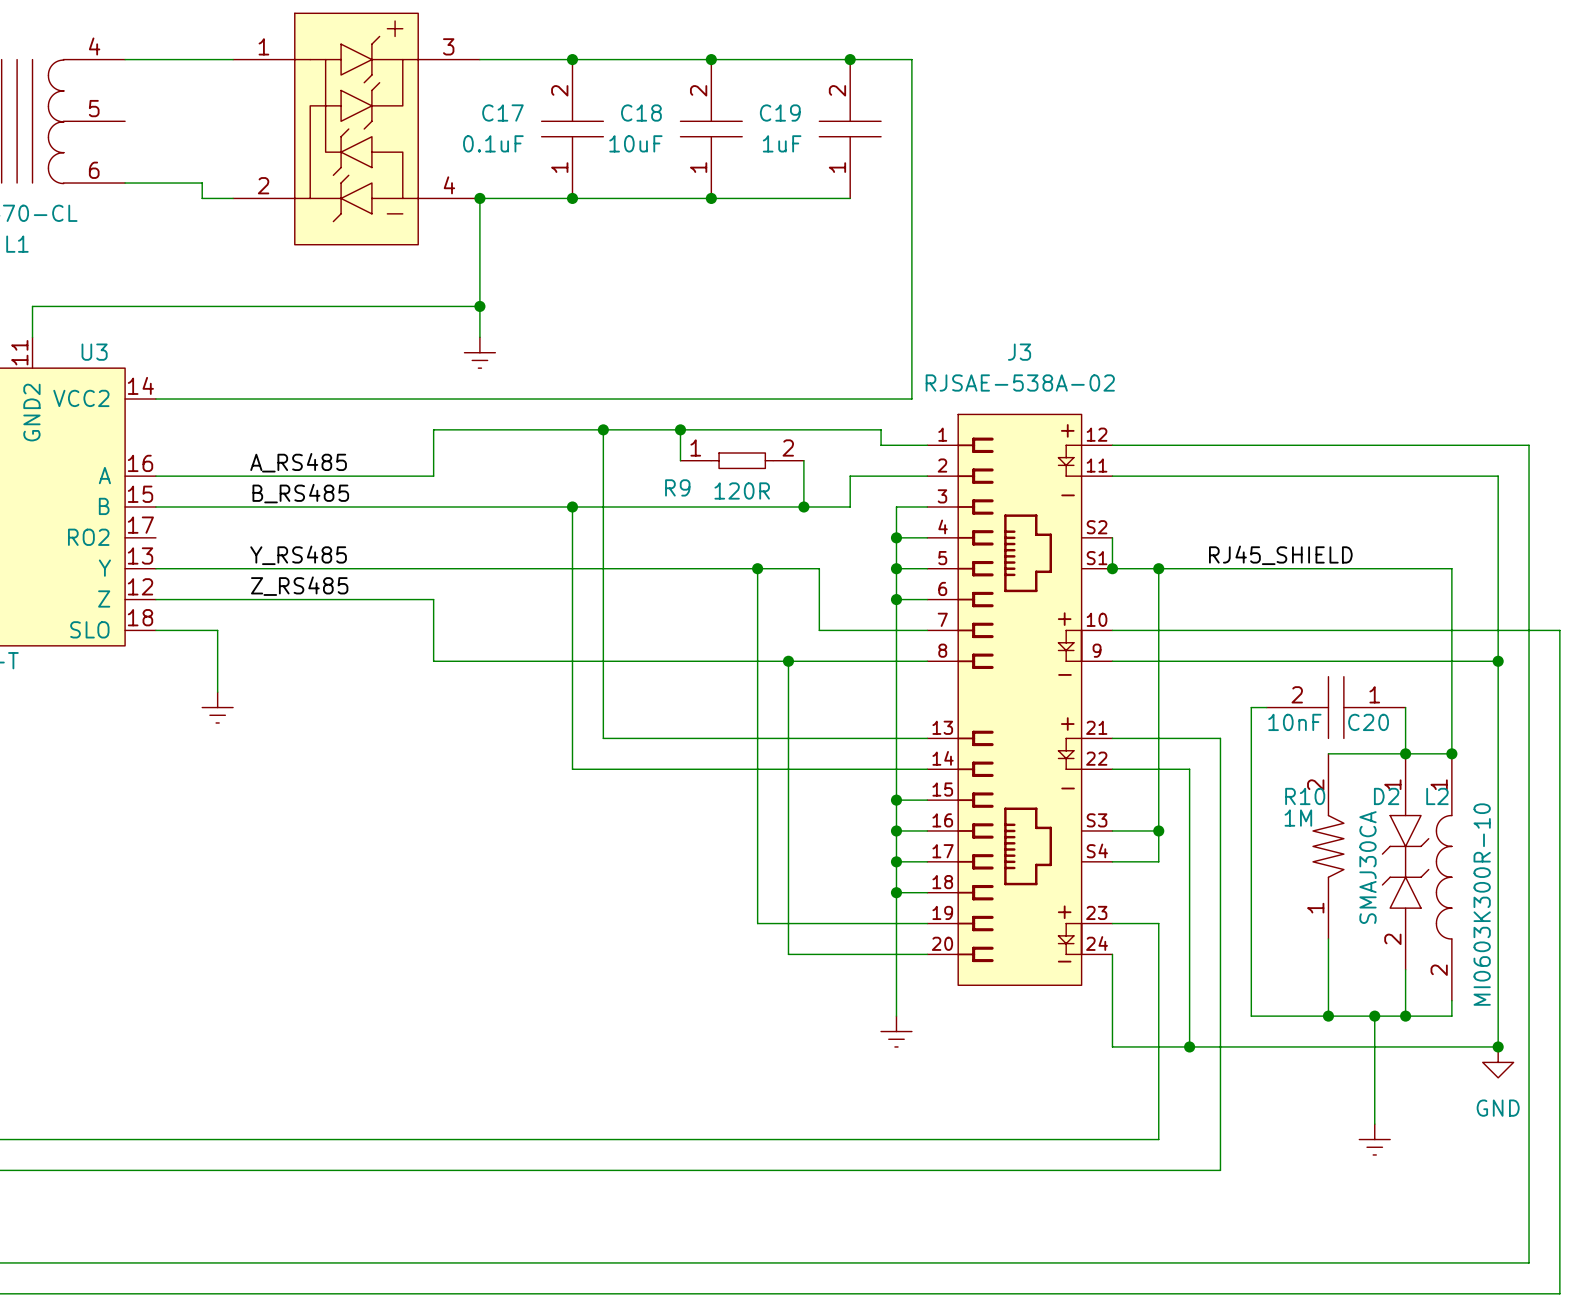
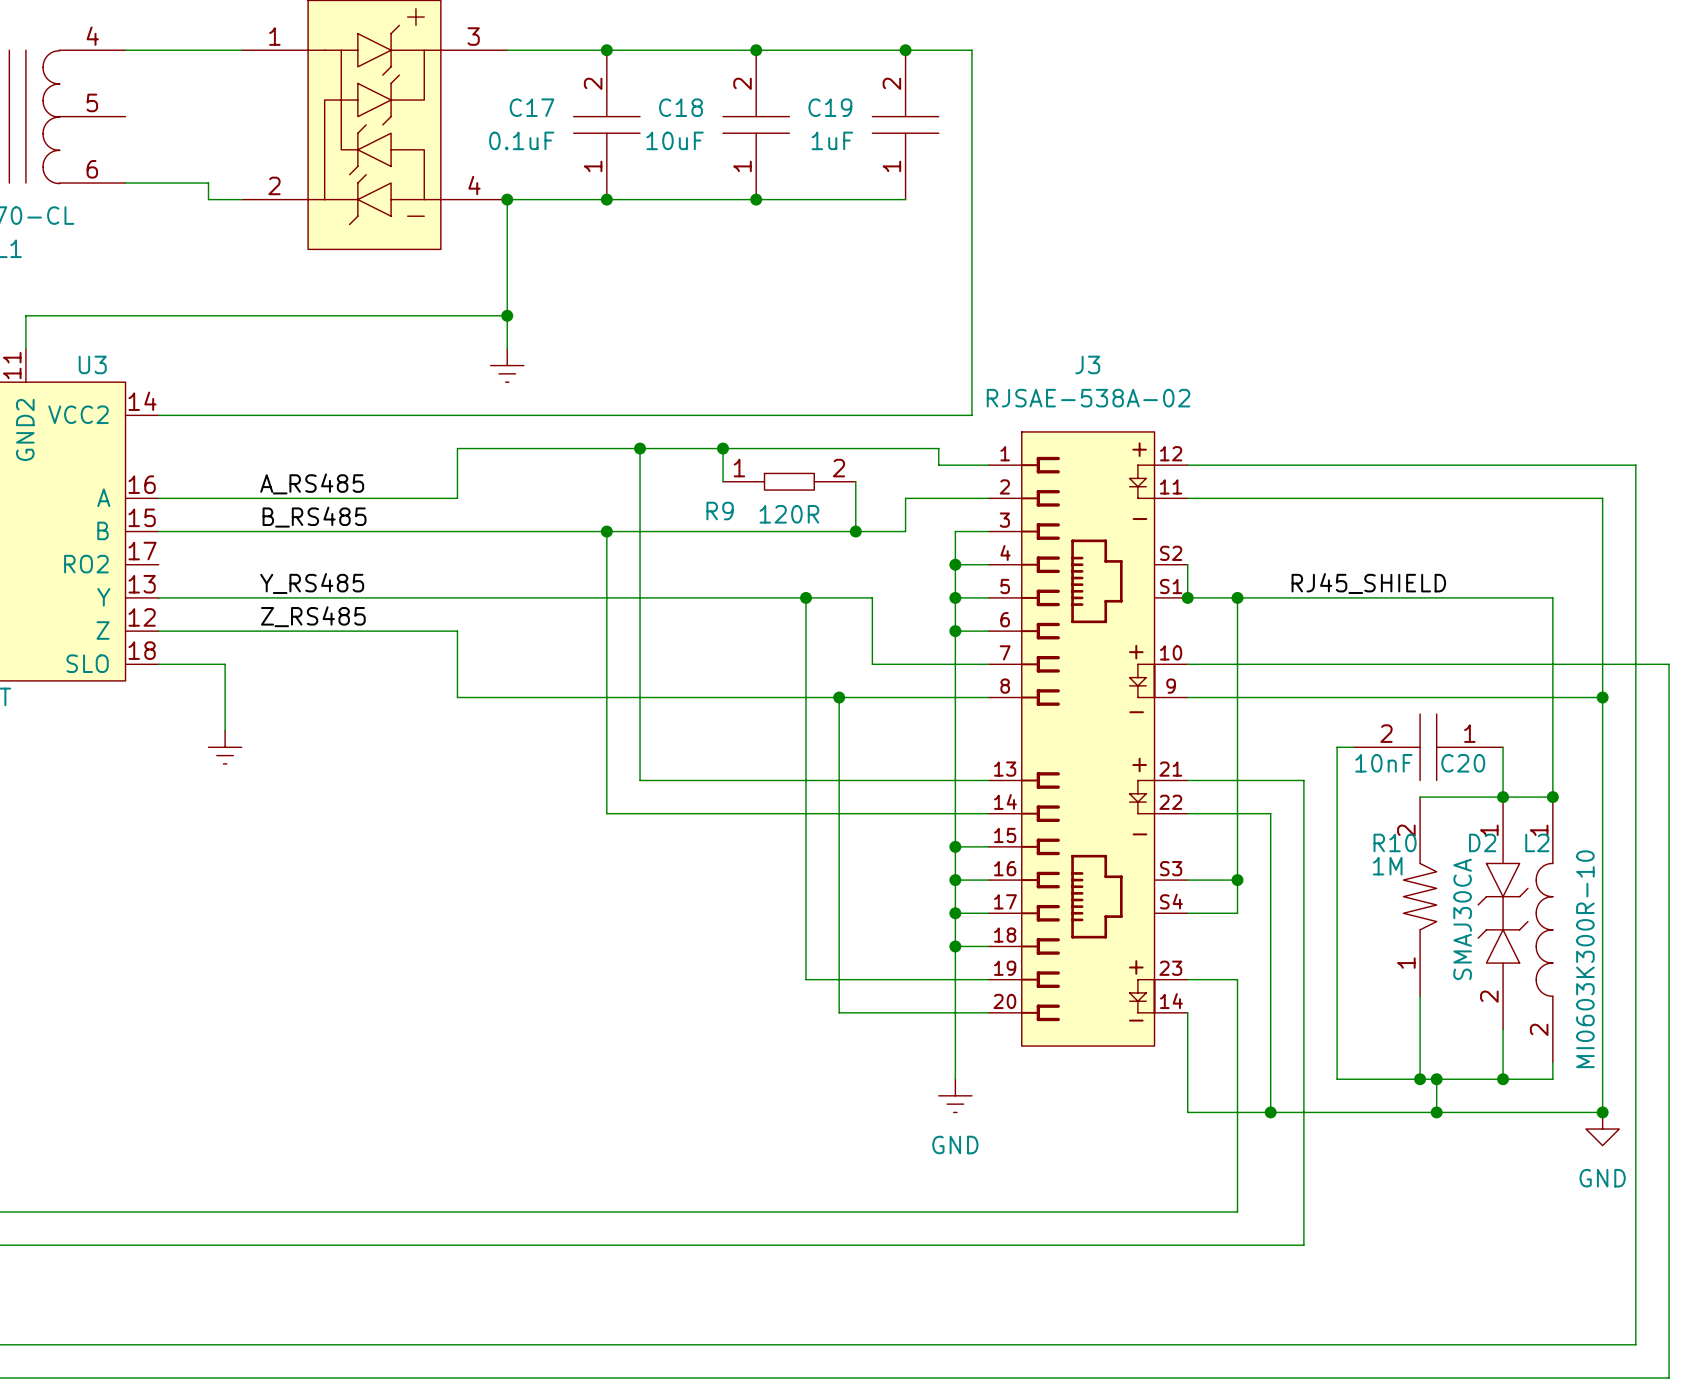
J3 pin number: 24 (1097, 943) -> 14 (1171, 1001)
wire: none -> (1436, 1079) (1436, 1112)
junction: none -> (1436, 1079)
wire: (1374, 1016) (1374, 1124) -> none
junction: (1374, 1016) -> none
junction: none -> (1436, 1112)
power symbol text: none -> GND (955, 1145)
power symbol: (1374, 1139) -> none

